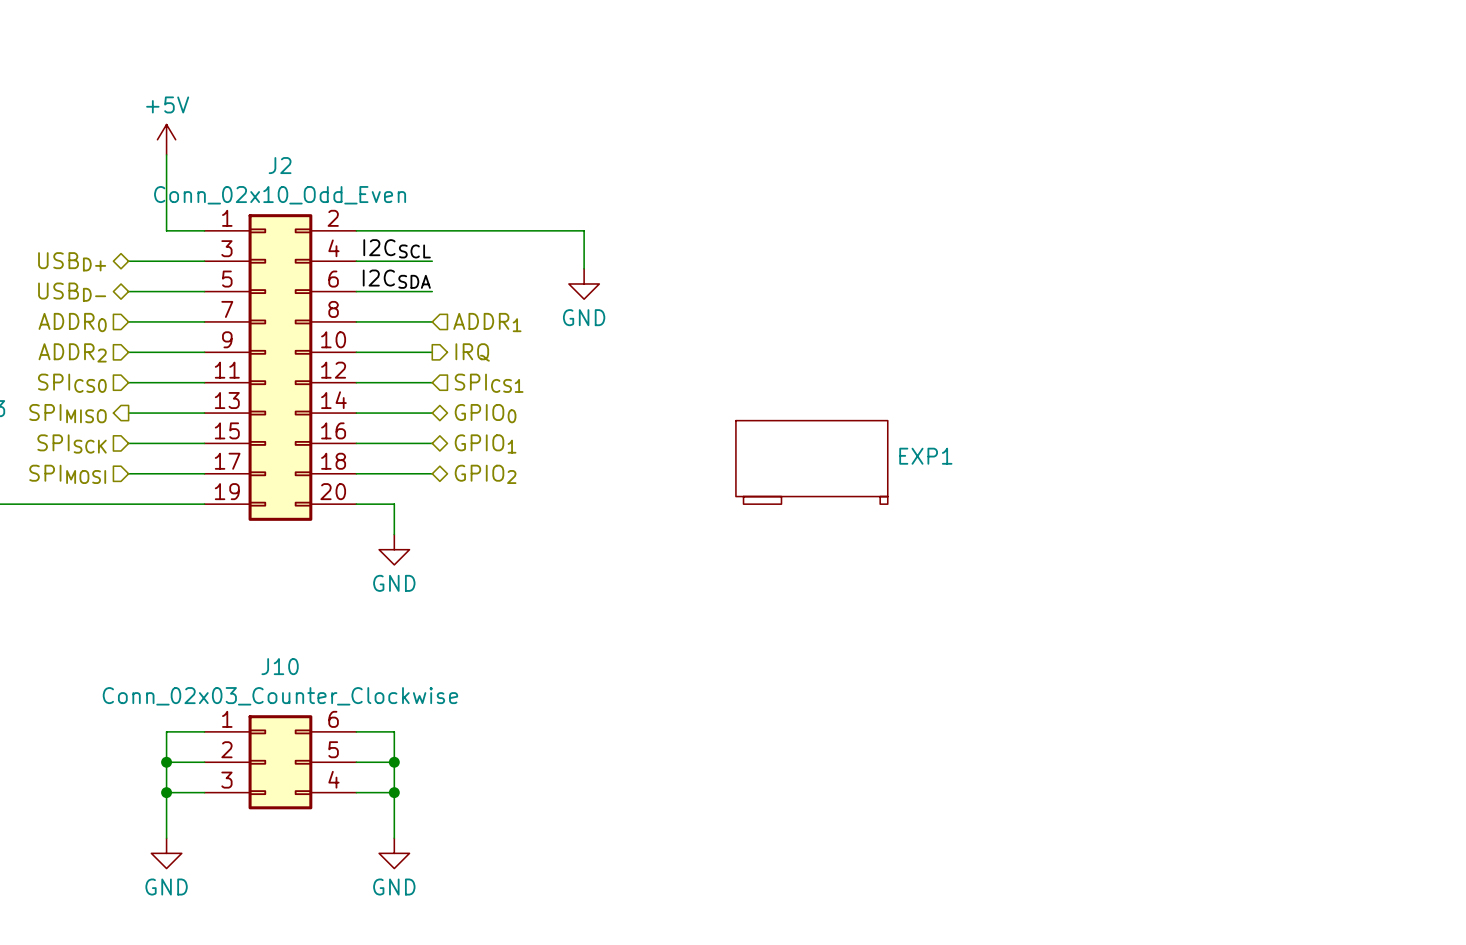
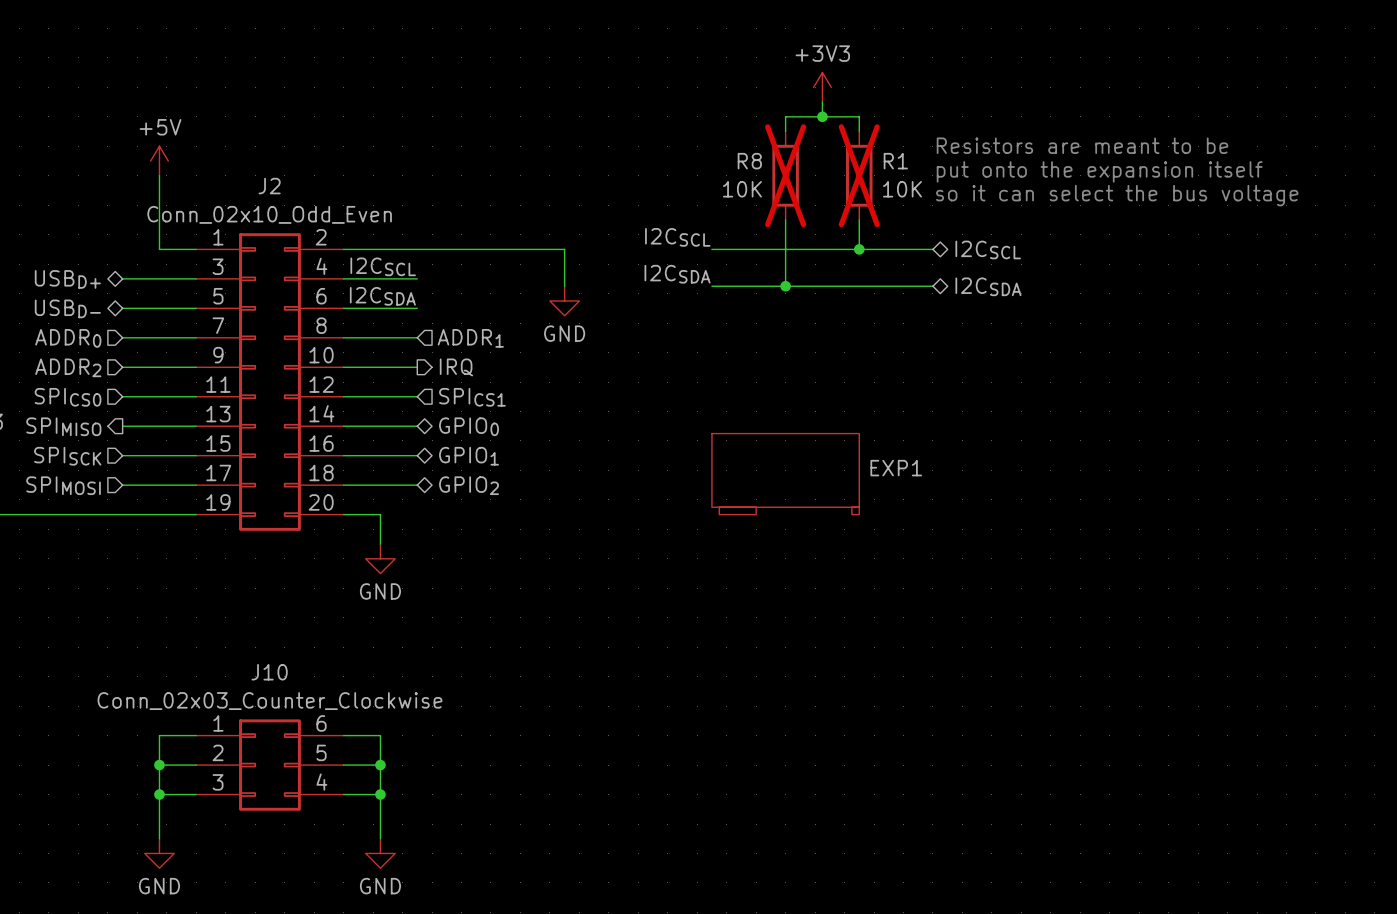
power symbol: none -> +3V3 (822, 87)
wire: none -> (822, 102) (822, 116)
junction: none -> (822, 116)
wire: none -> (785, 131) (785, 116) (859, 116) (859, 131)
text: none -> Resistors are meant to be (1082, 145)
text: none -> put onto the expansion itself (1099, 171)
R8: none -> 10K (785, 175)
R1: none -> 10K (859, 175)
text: none -> so it can select the bus voltage (1117, 195)
wire: none -> (785, 219) (785, 286)
wire: none -> (859, 219) (859, 249)
label: none -> I2CSCL (677, 237)
wire: none -> (711, 249) (932, 249)
junction: none -> (859, 249)
hierarchical label: none -> I2CSCL (988, 249)
label: none -> I2CSDA (677, 274)
wire: none -> (711, 286) (932, 286)
junction: none -> (785, 286)
hierarchical label: none -> I2CSDA (988, 286)

